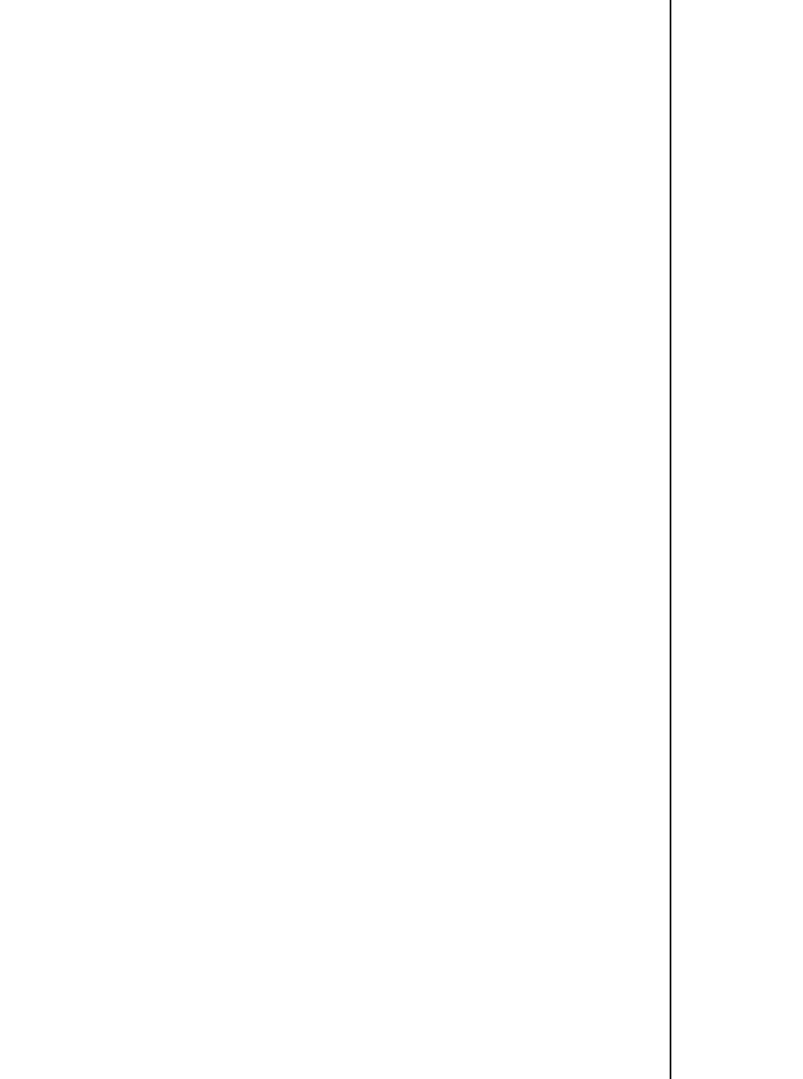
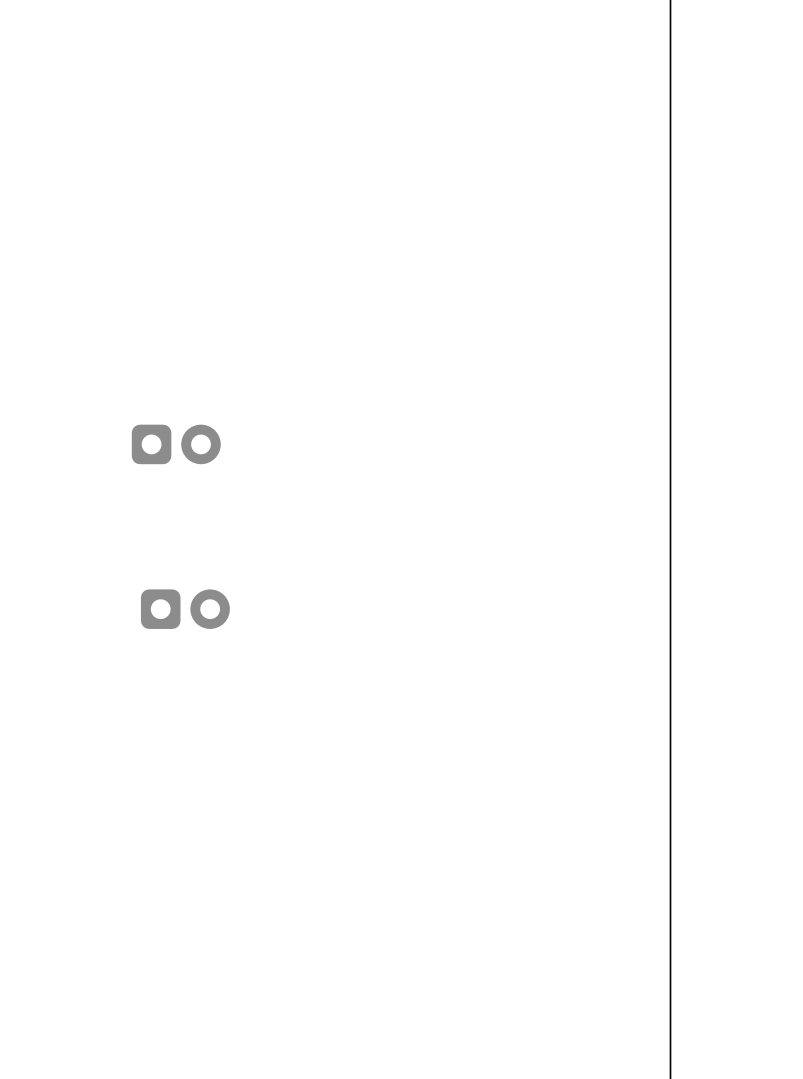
part: none -> (176, 444)
part: none -> (185, 609)

